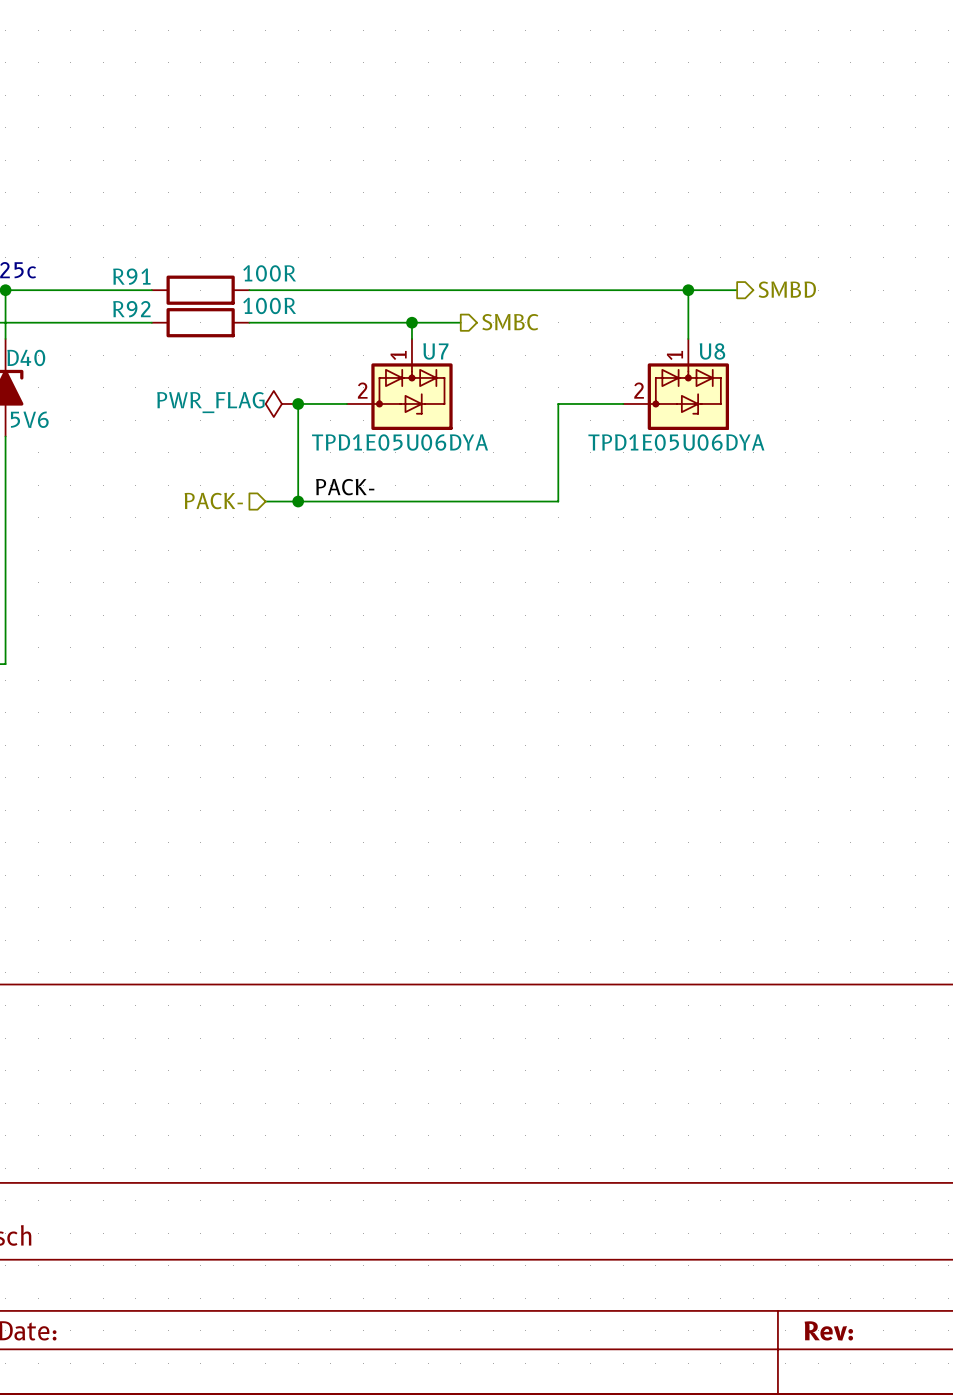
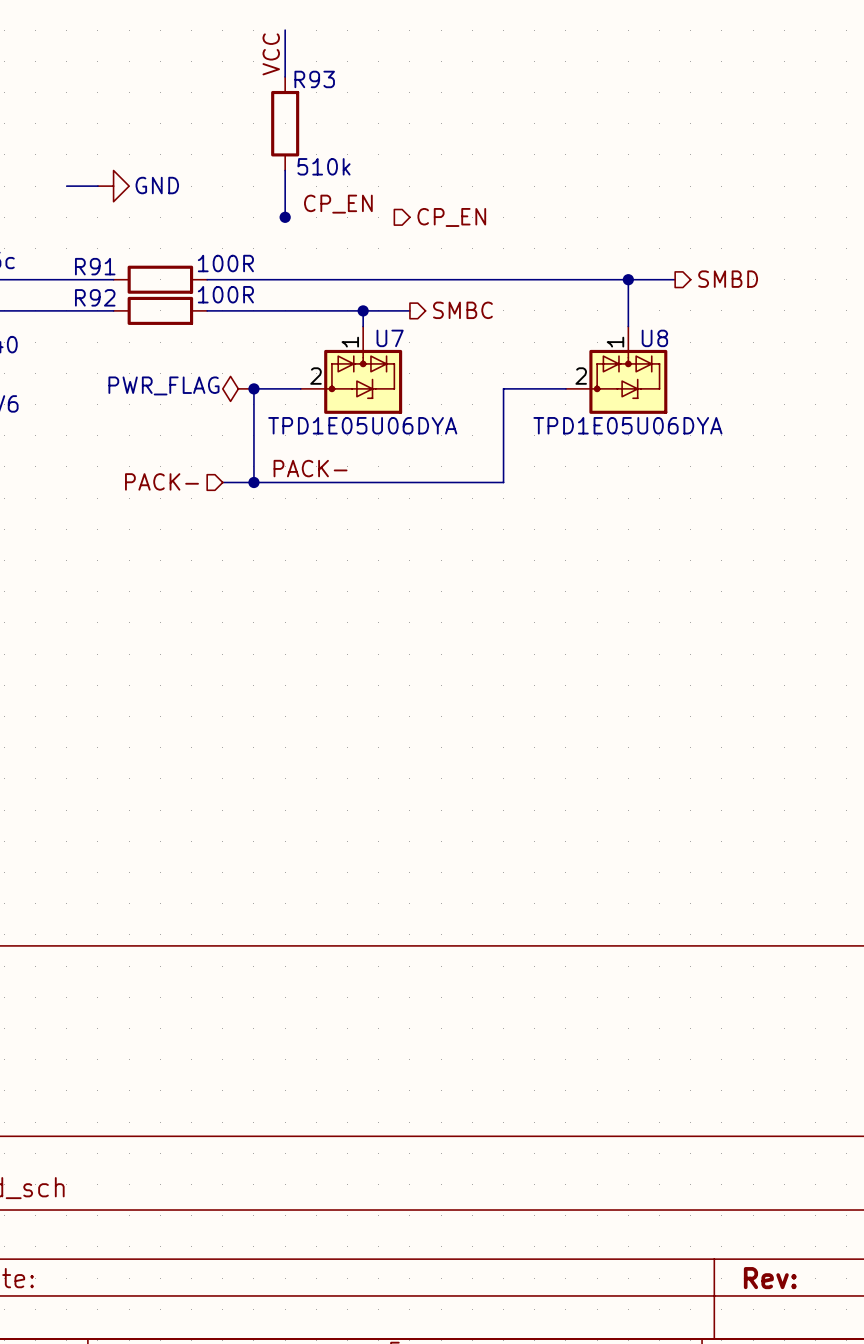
wire: none -> (285, 30) (285, 76)
label: none -> VCC (271, 54)
R93: none -> 510k (285, 123)
wire: none -> (285, 170) (285, 217)
wire: none -> (66, 186) (97, 186)
power symbol: none -> GND (113, 186)
label: none -> CP_EN (338, 204)
junction: none -> (285, 217)
hierarchical label: none -> CP_EN (451, 217)

